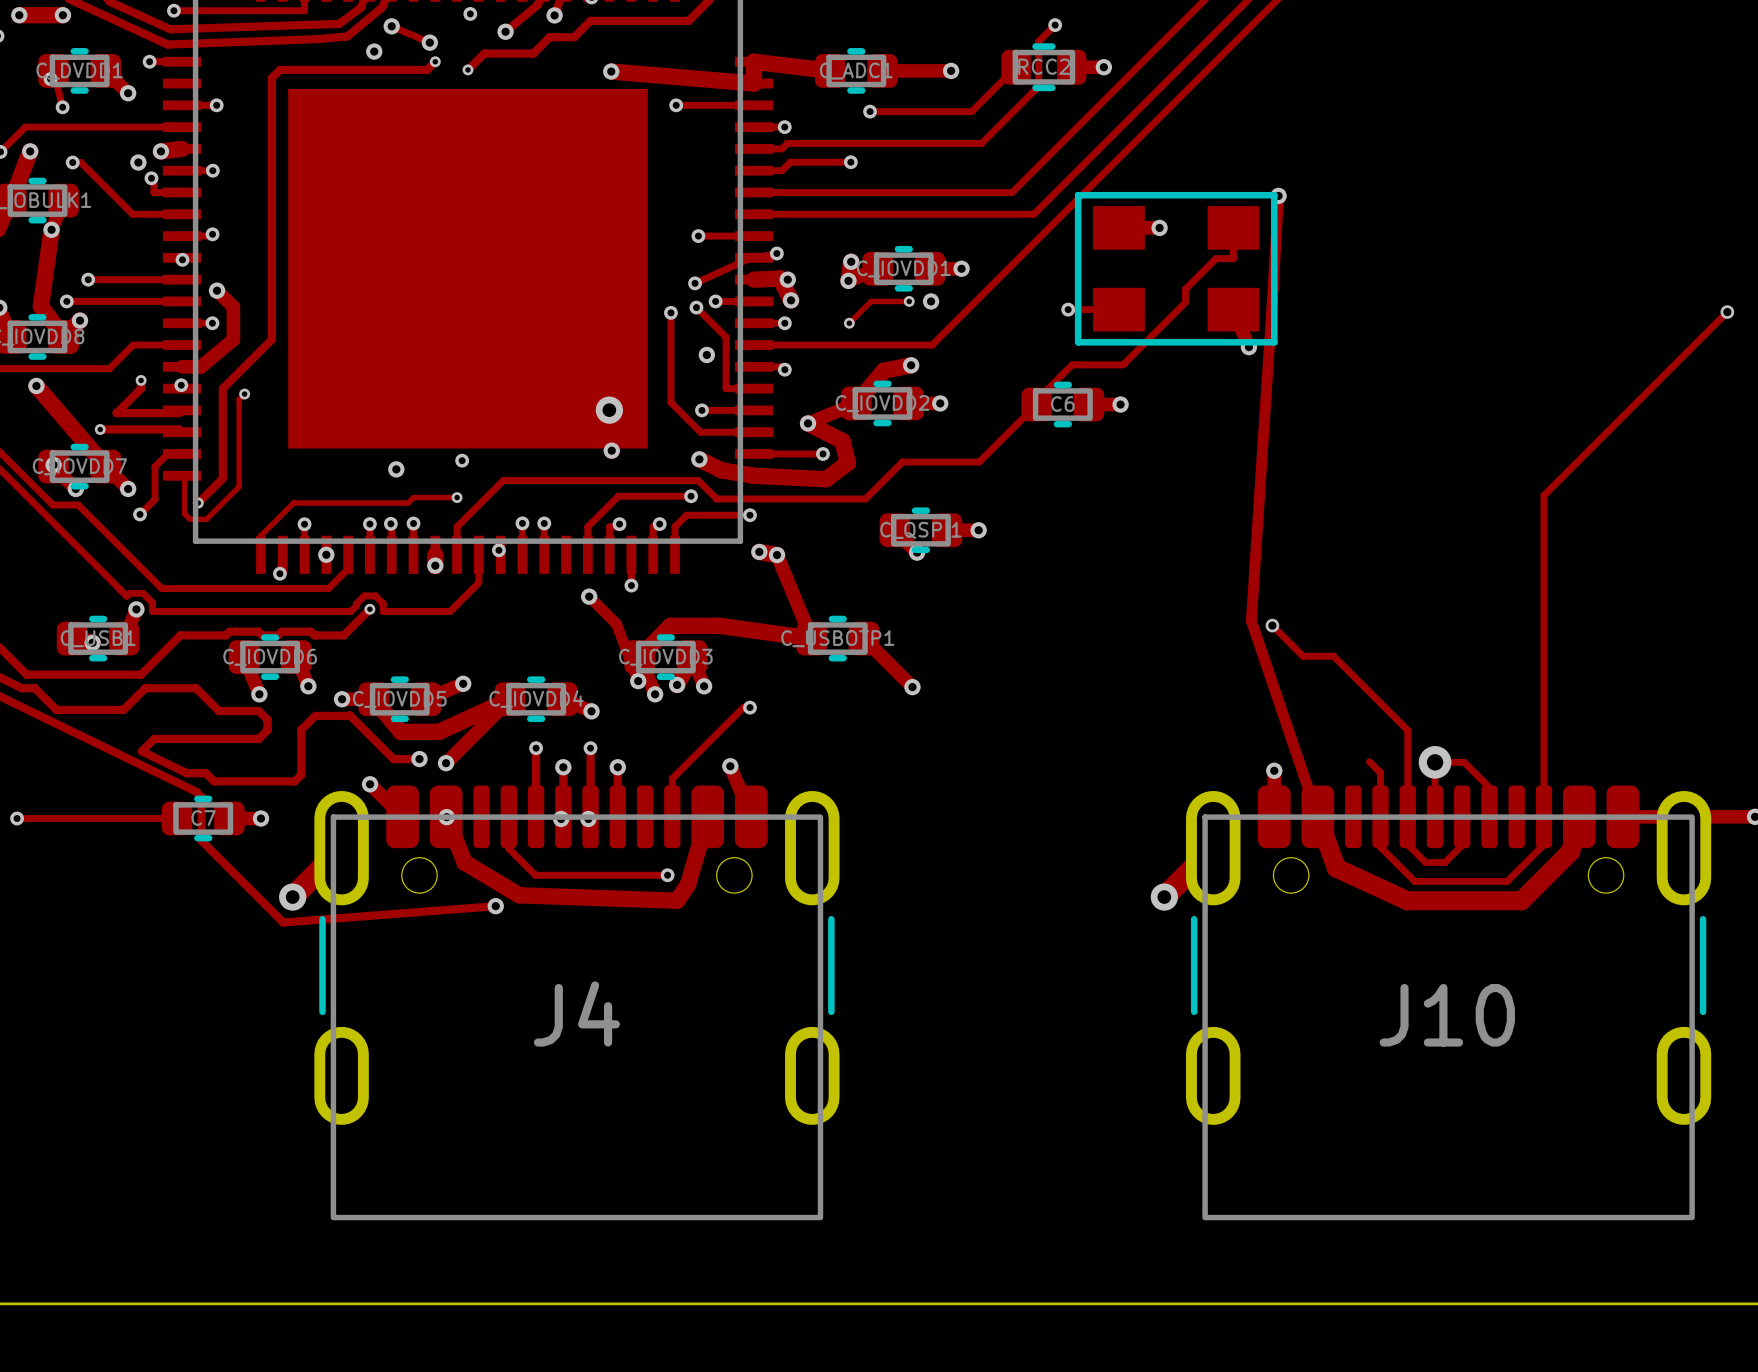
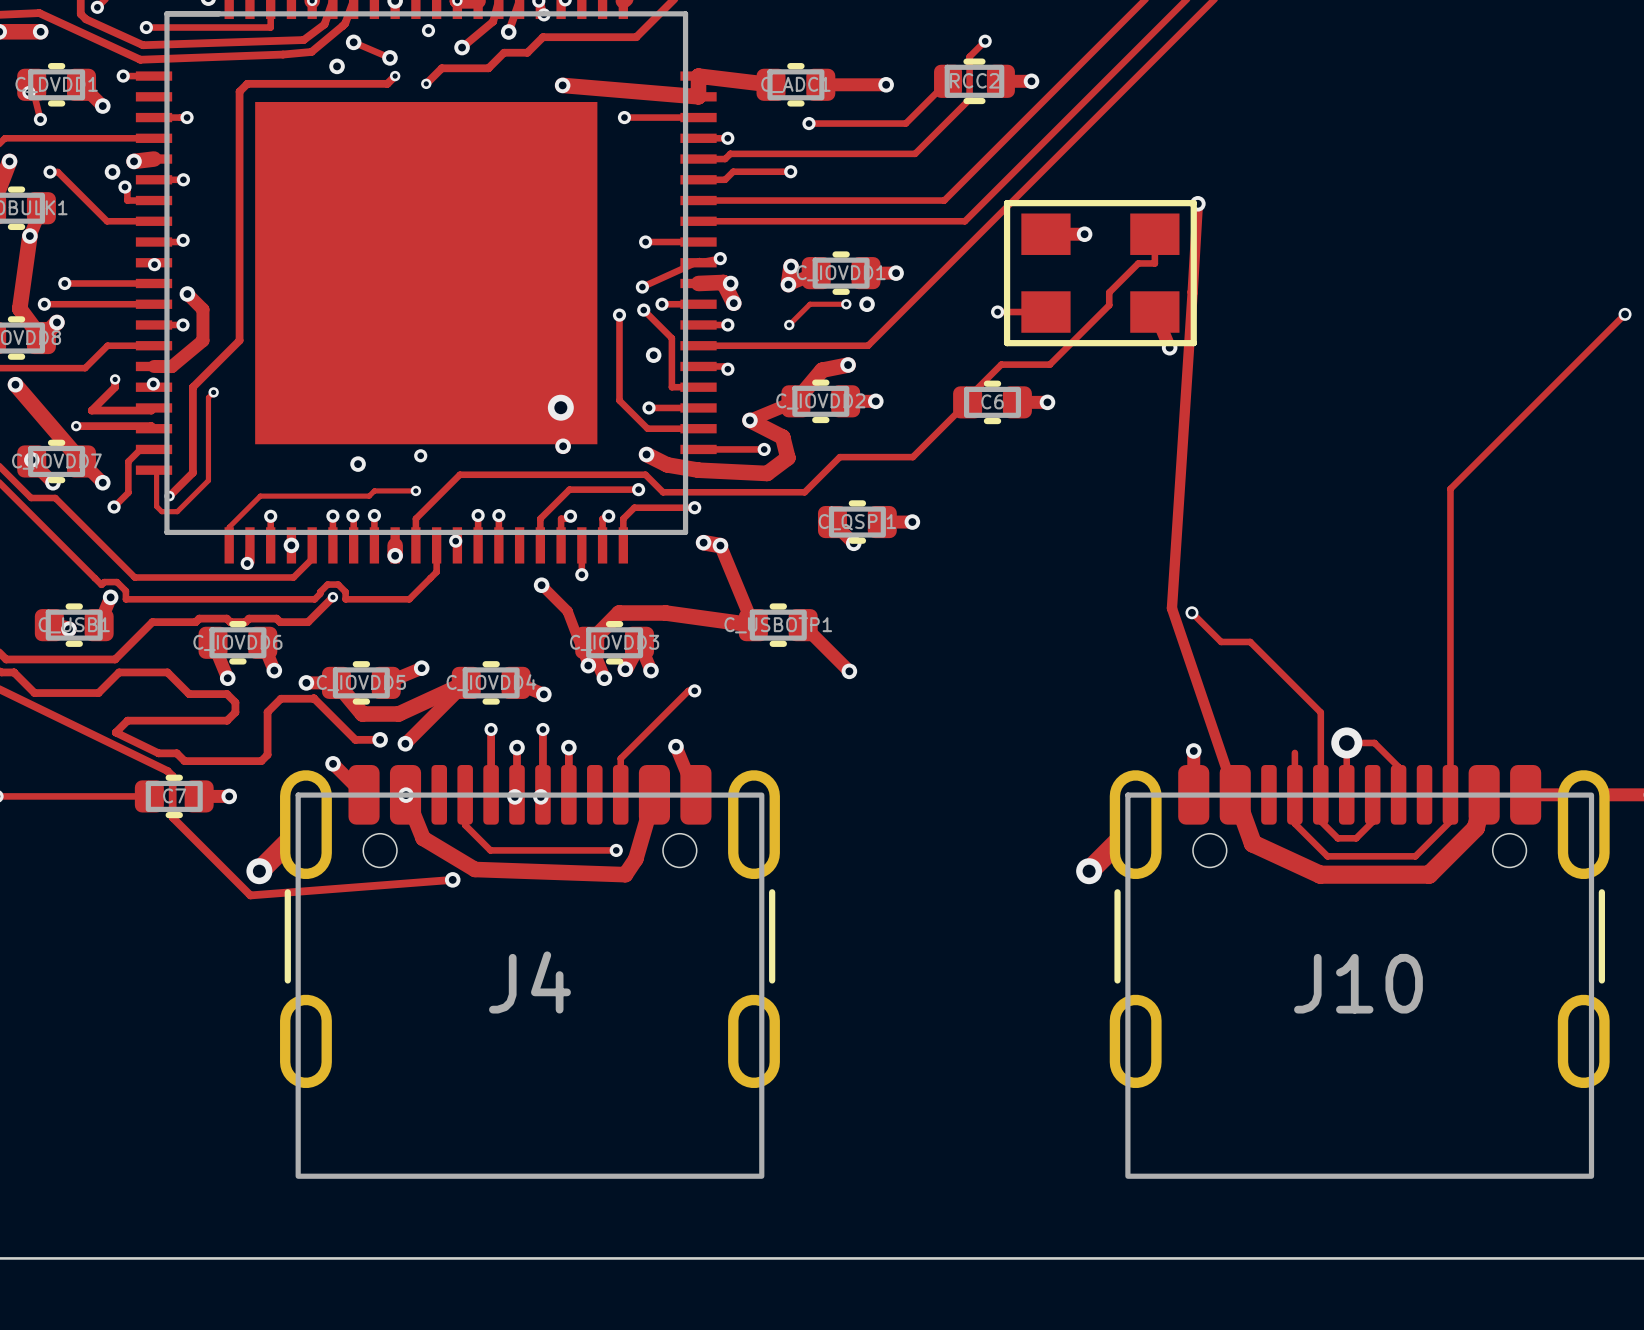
track: (1369, 761) (1380, 772) -> none

